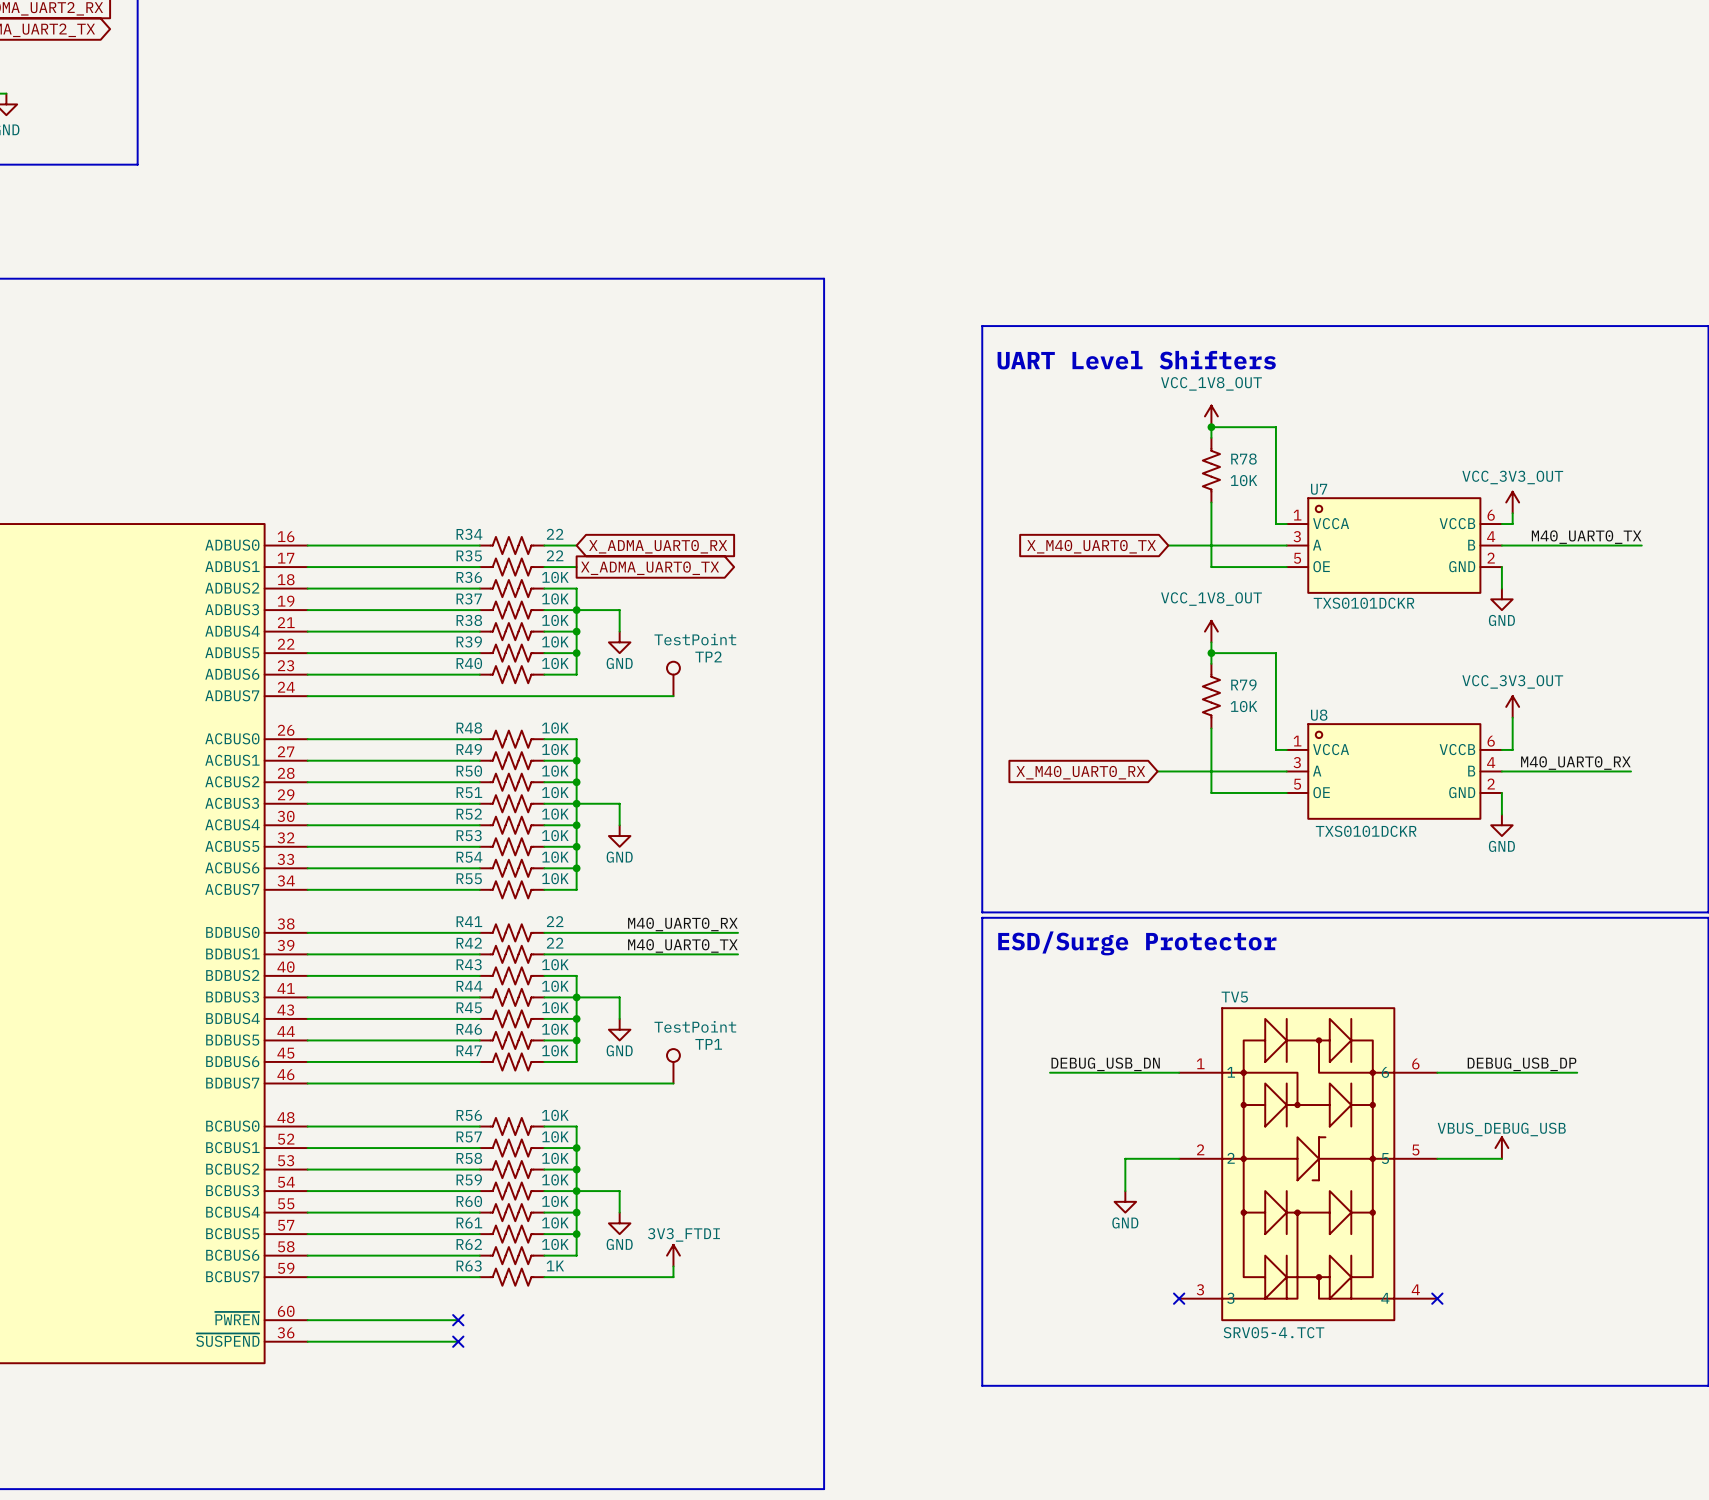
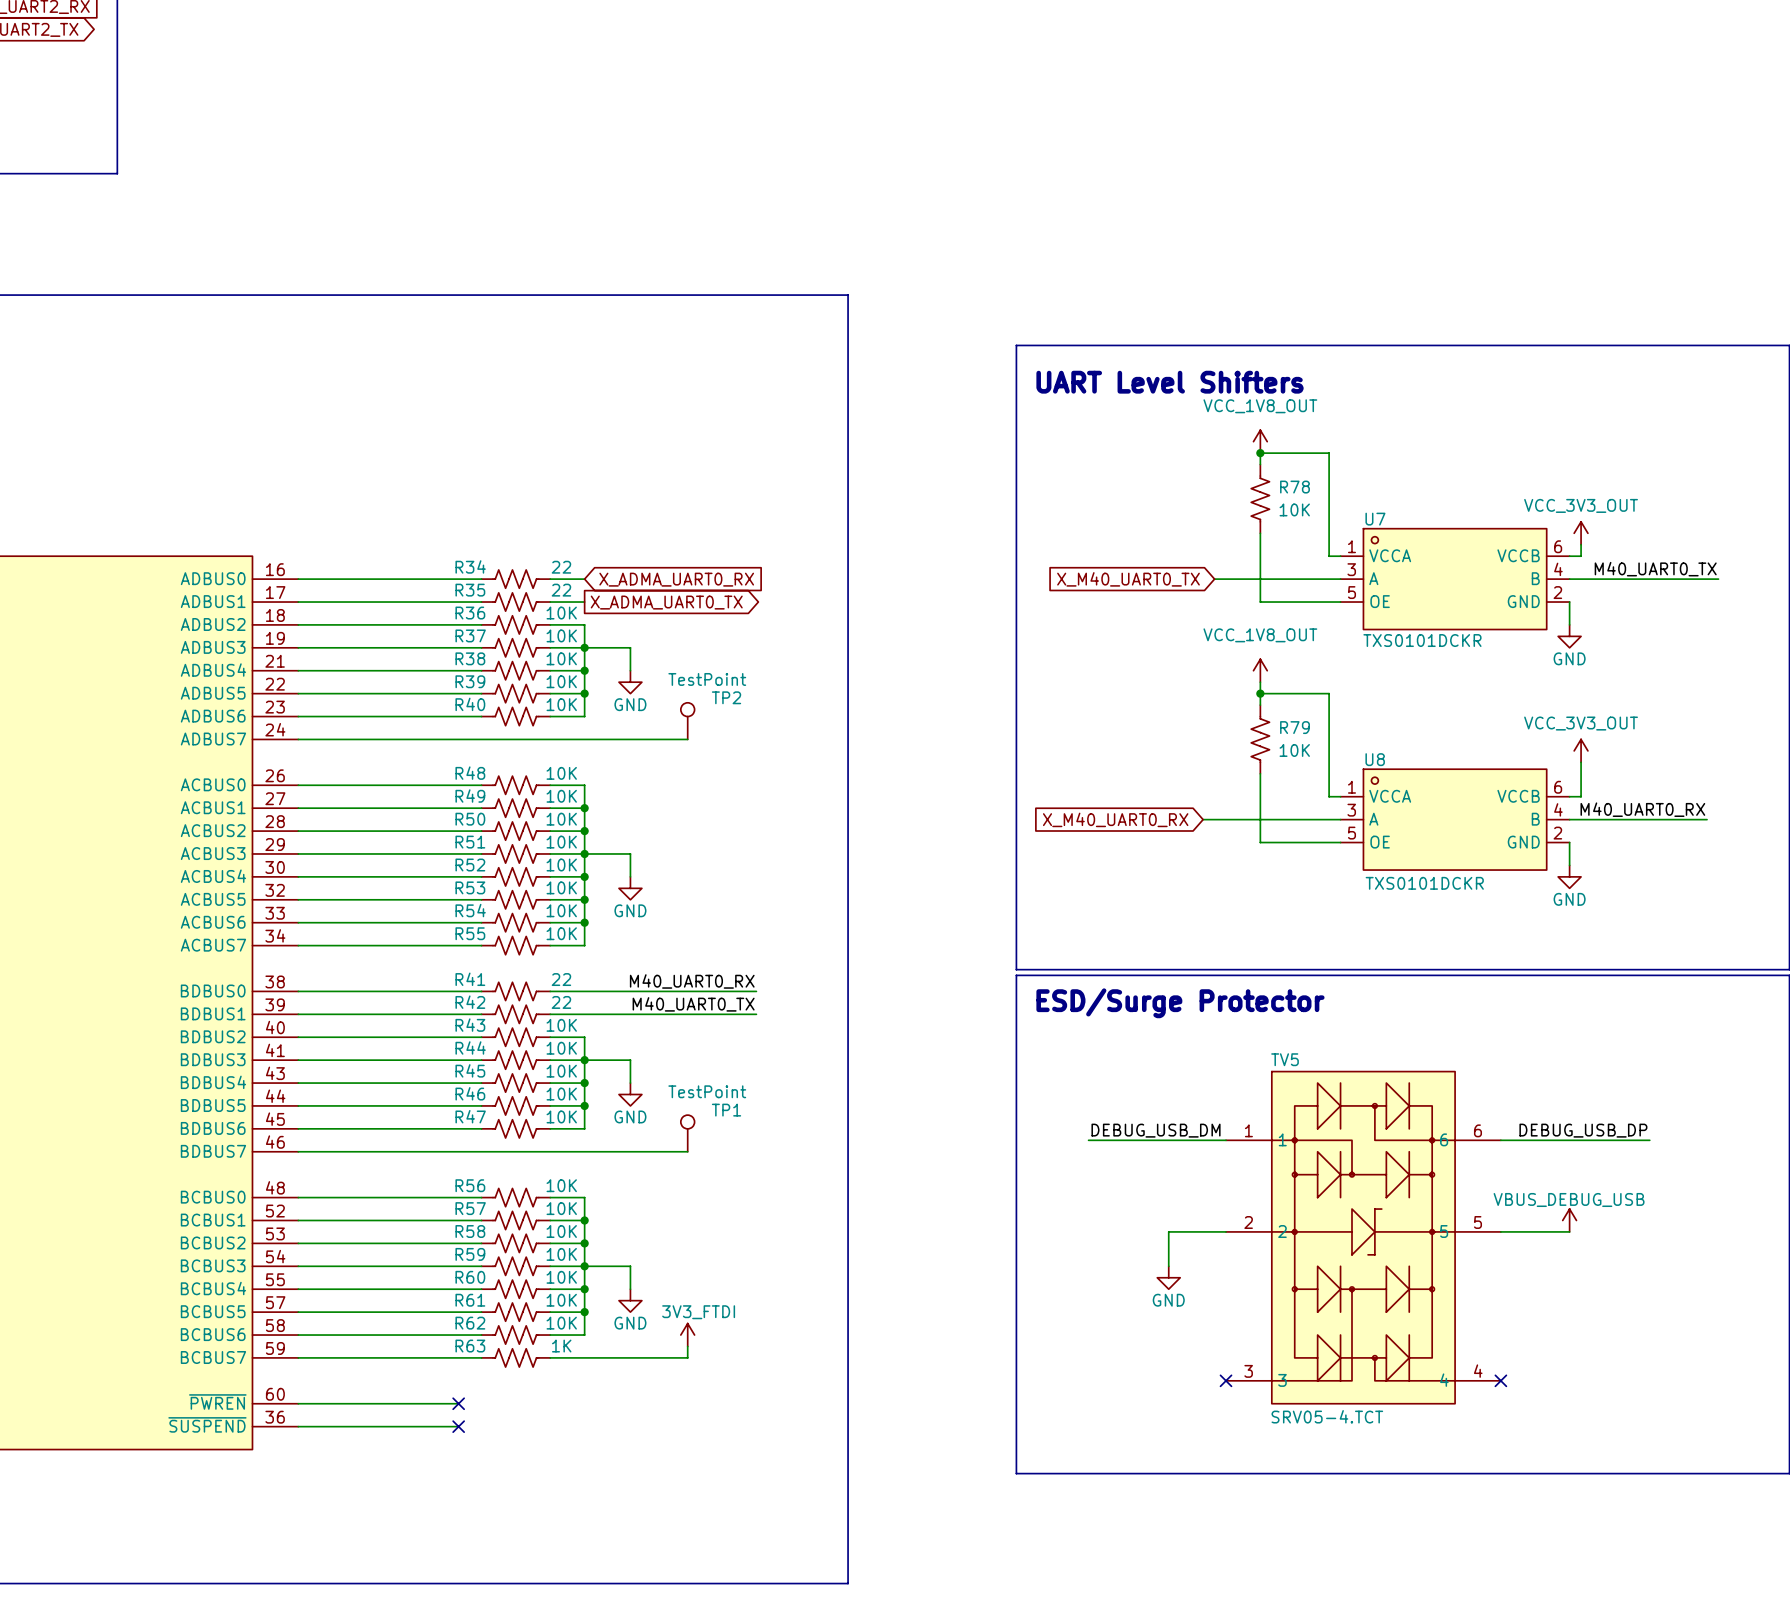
label: DEBUG_USB_DN (1105, 1064) -> DEBUG_USB_DM (1156, 1130)

